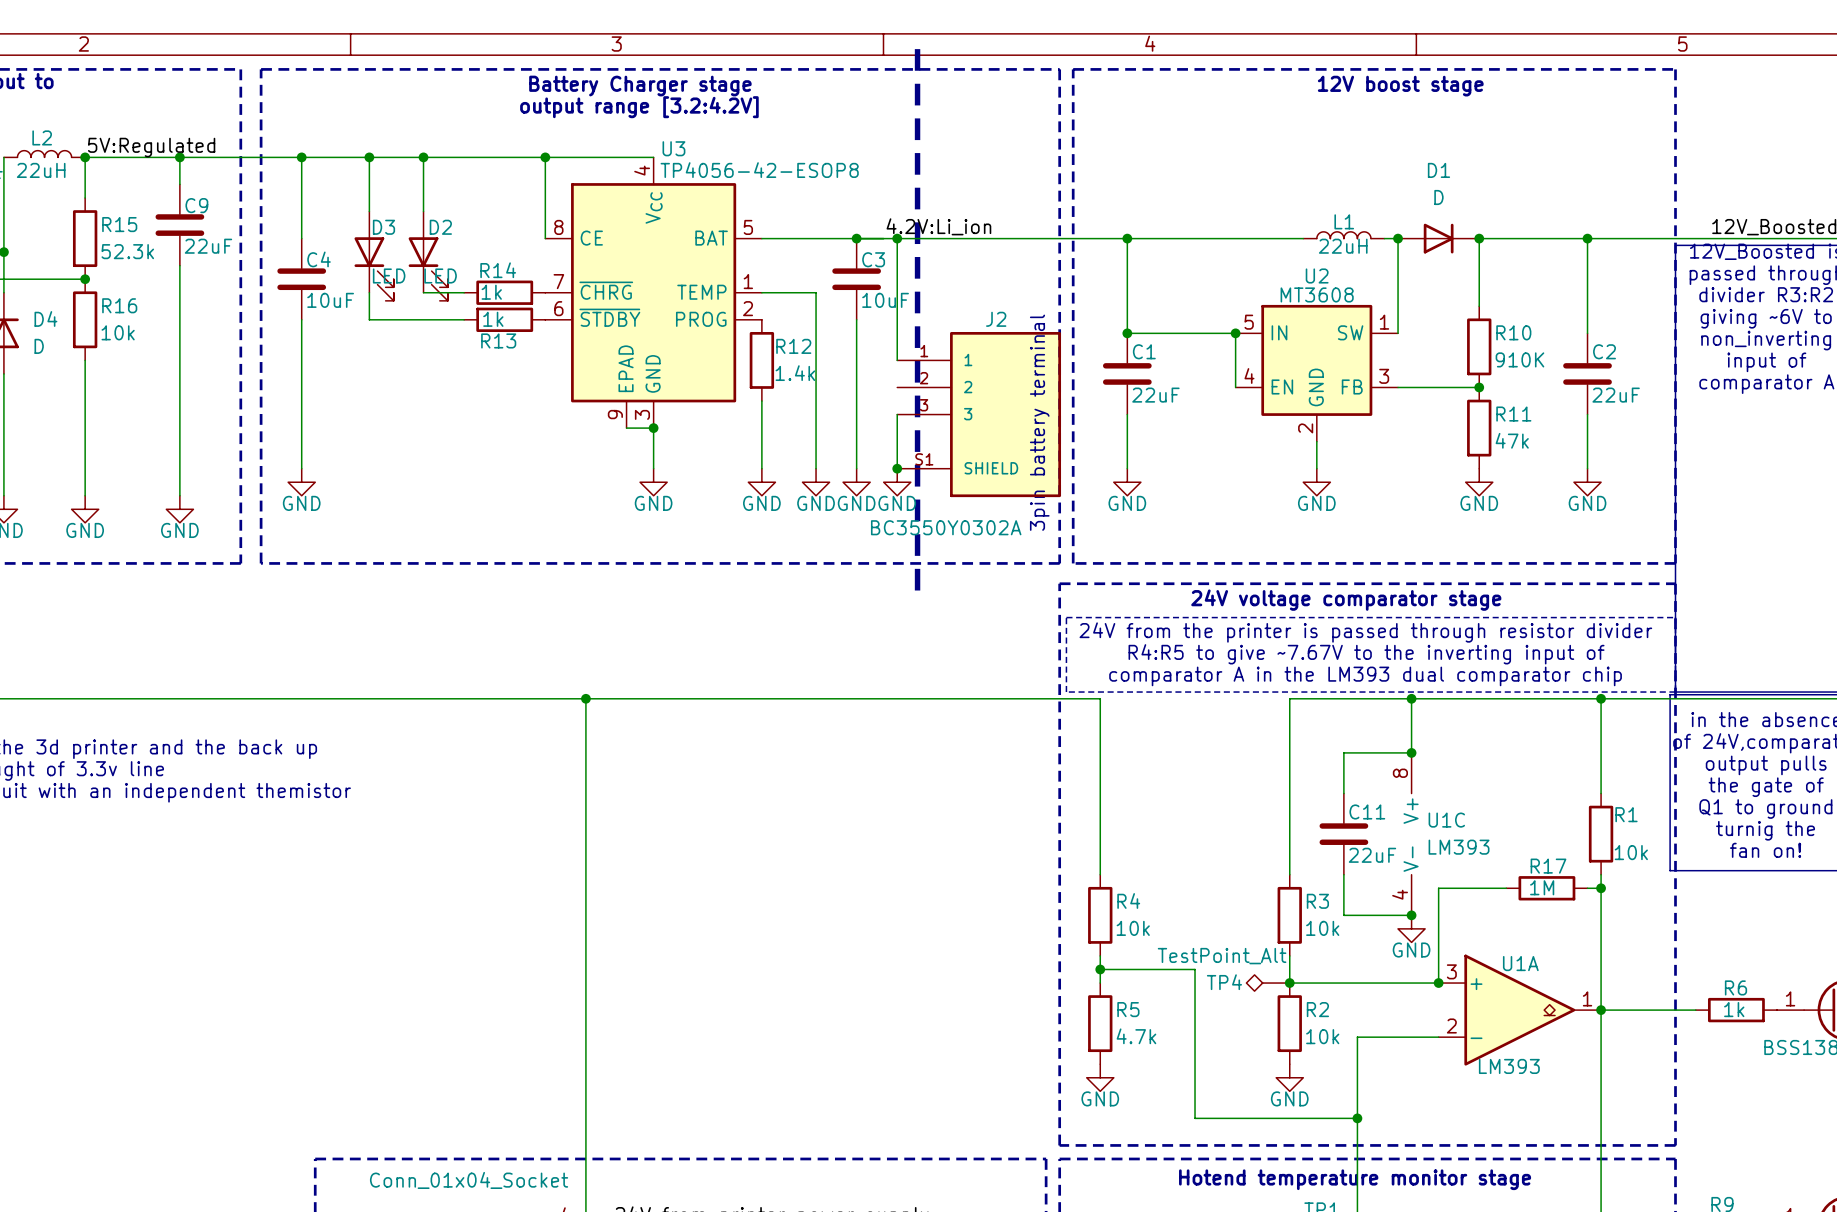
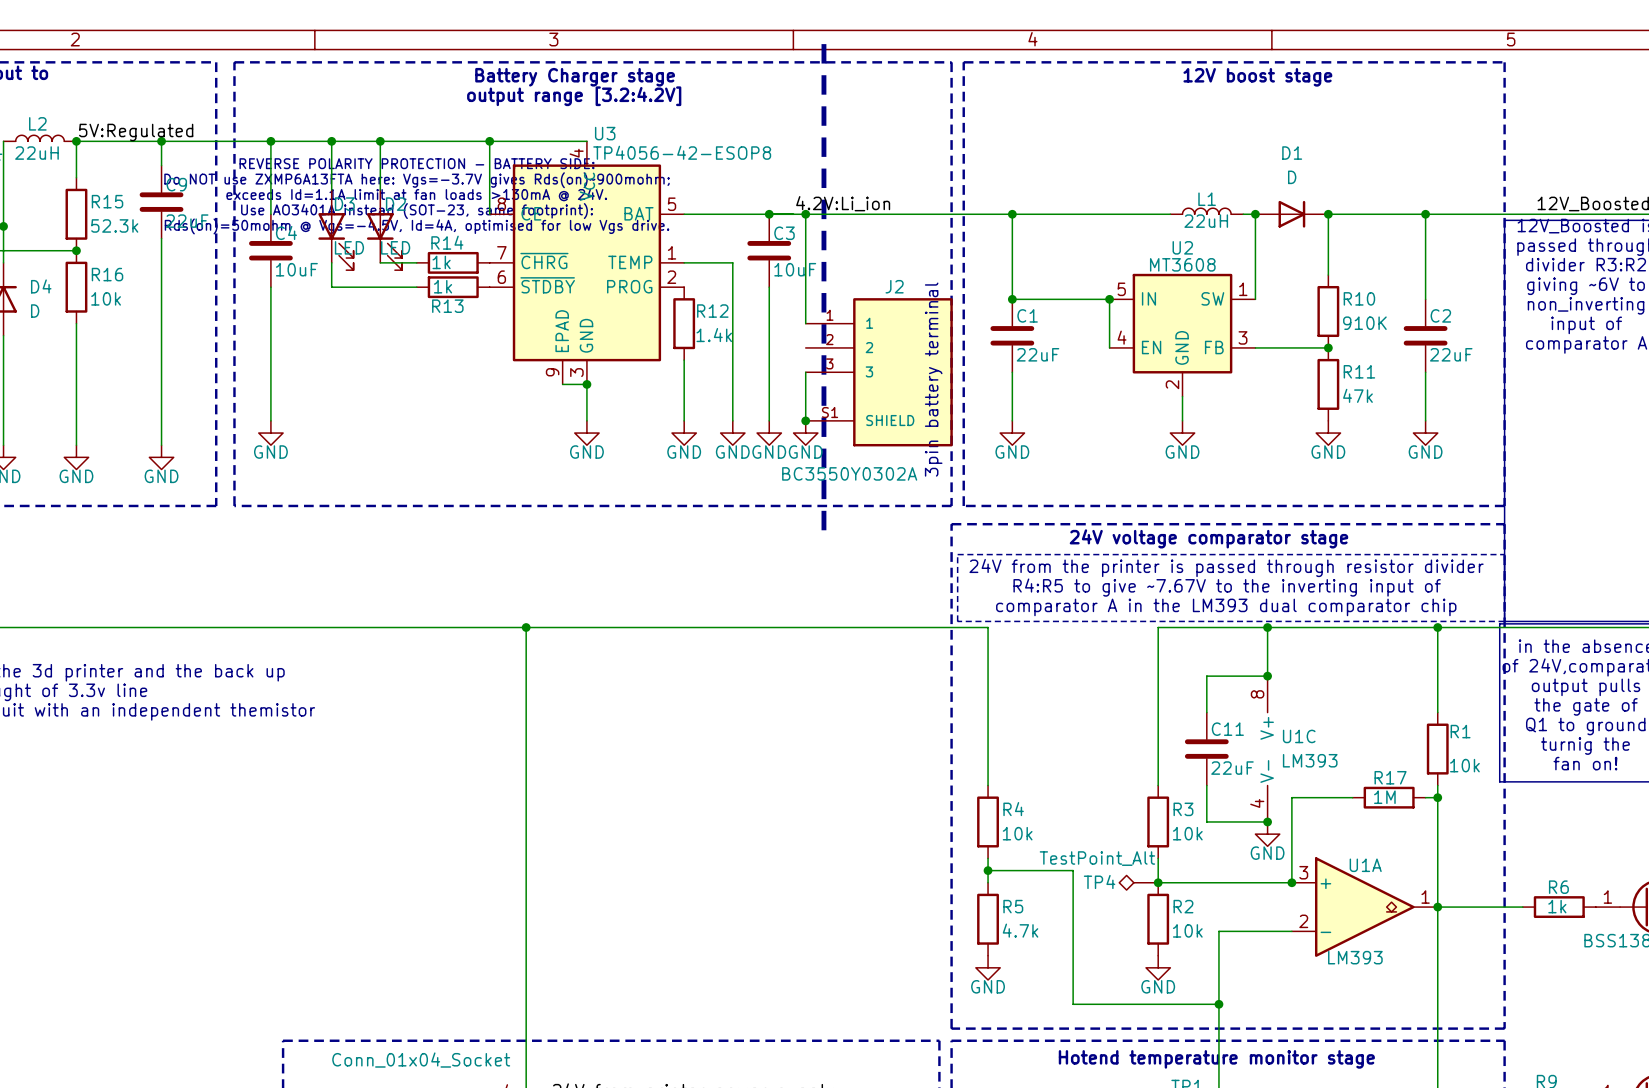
text: none -> REVERSE POLARITY PROTECTION - BATTERY SIDE: (417, 163)
text: none -> Do NOT use ZXMP6A13FTA here: Vgs=-3.7V gives Rds(on)~900mohm; (417, 180)
text: none -> exceeds Id=1.1A limit at fan loads >130mA @ 24V. (416, 194)
text: none -> Use AO3401A instead (SOT-23, same footprint): (417, 211)
text: none -> Rds(on)=50mohm @ Vgs=-4.5V, Id=4A, optimised for low Vgs drive. (417, 226)

